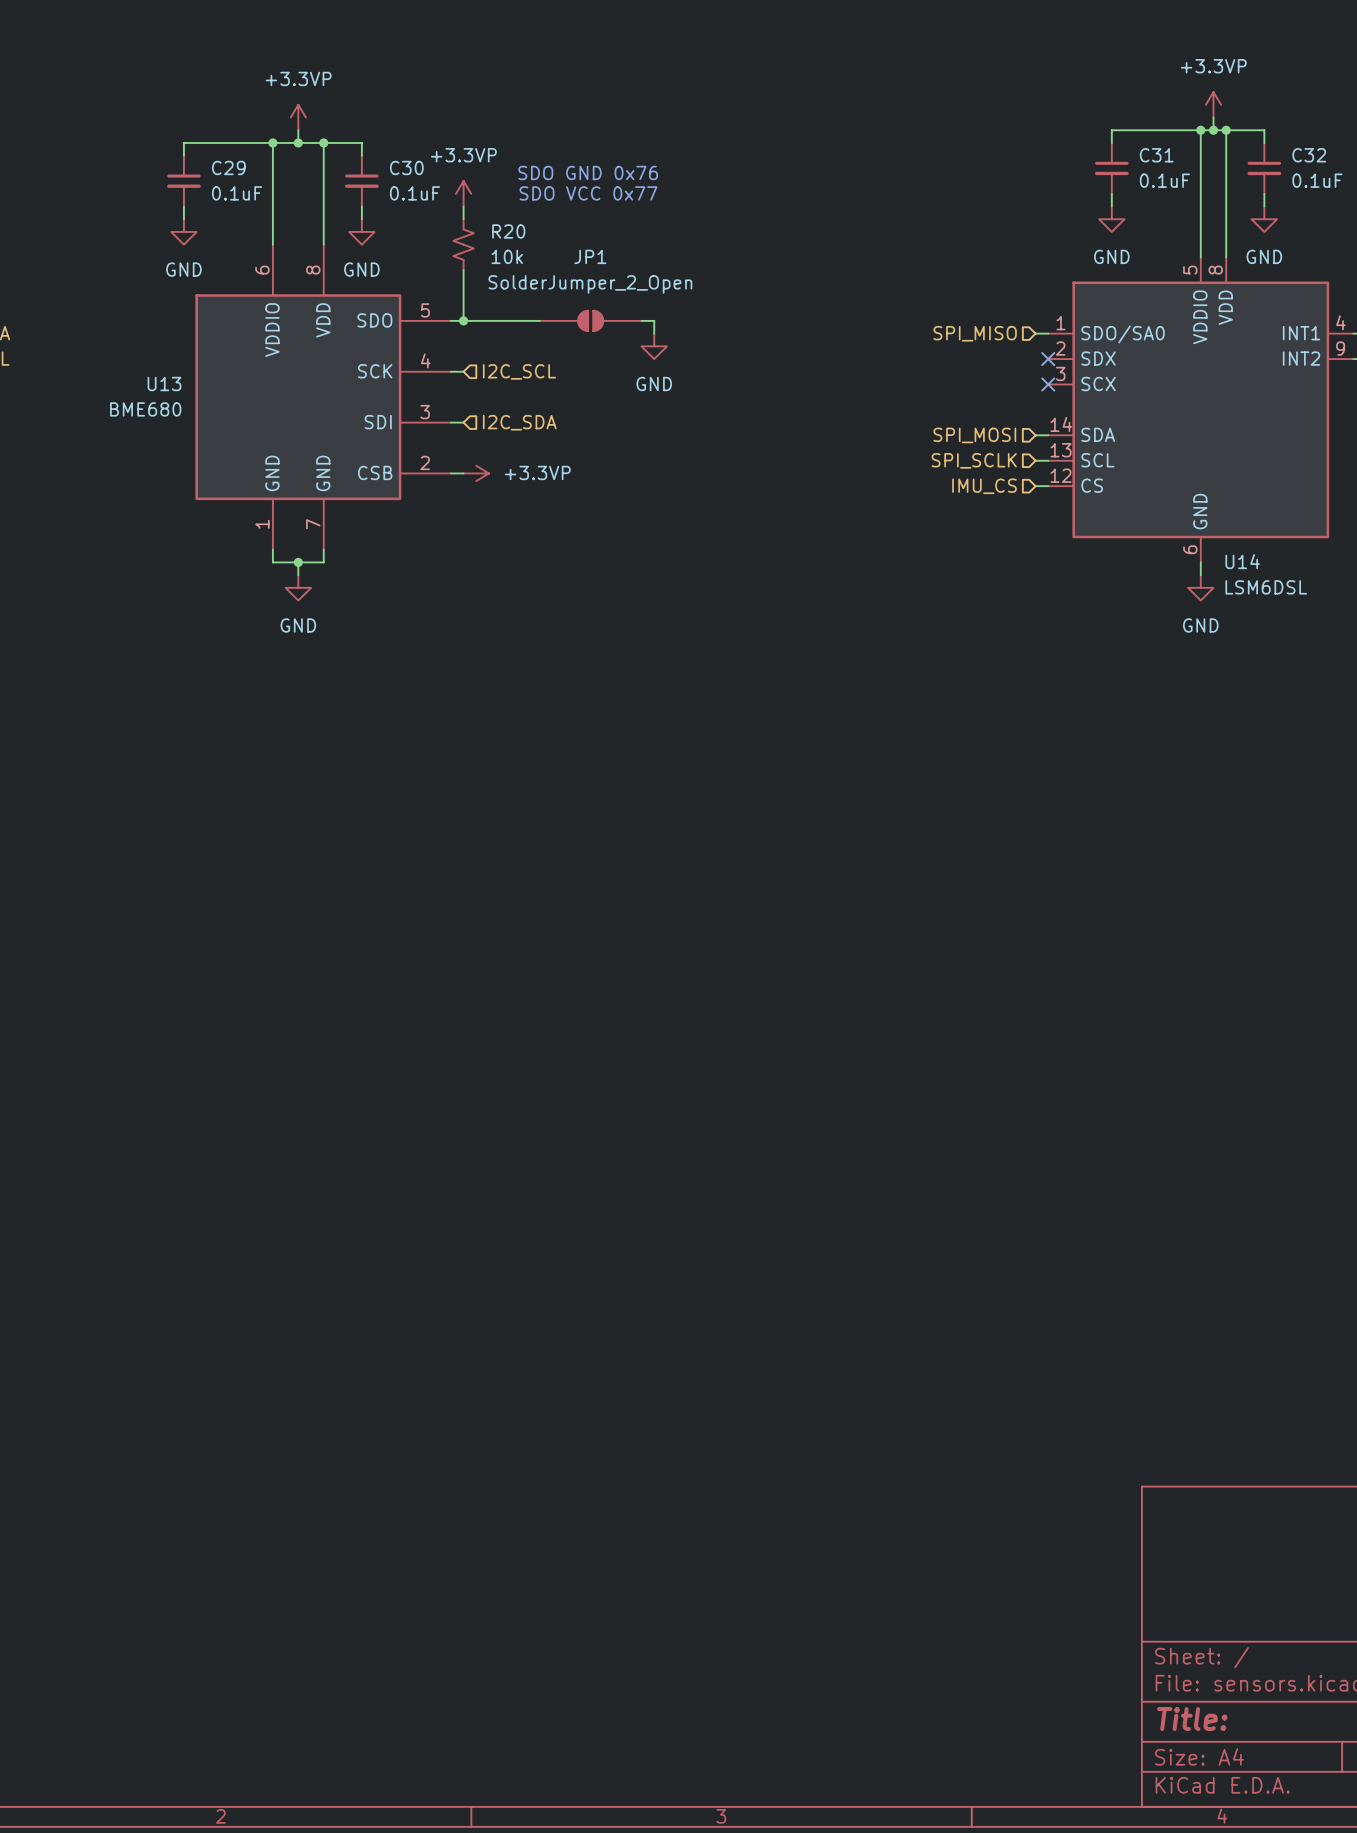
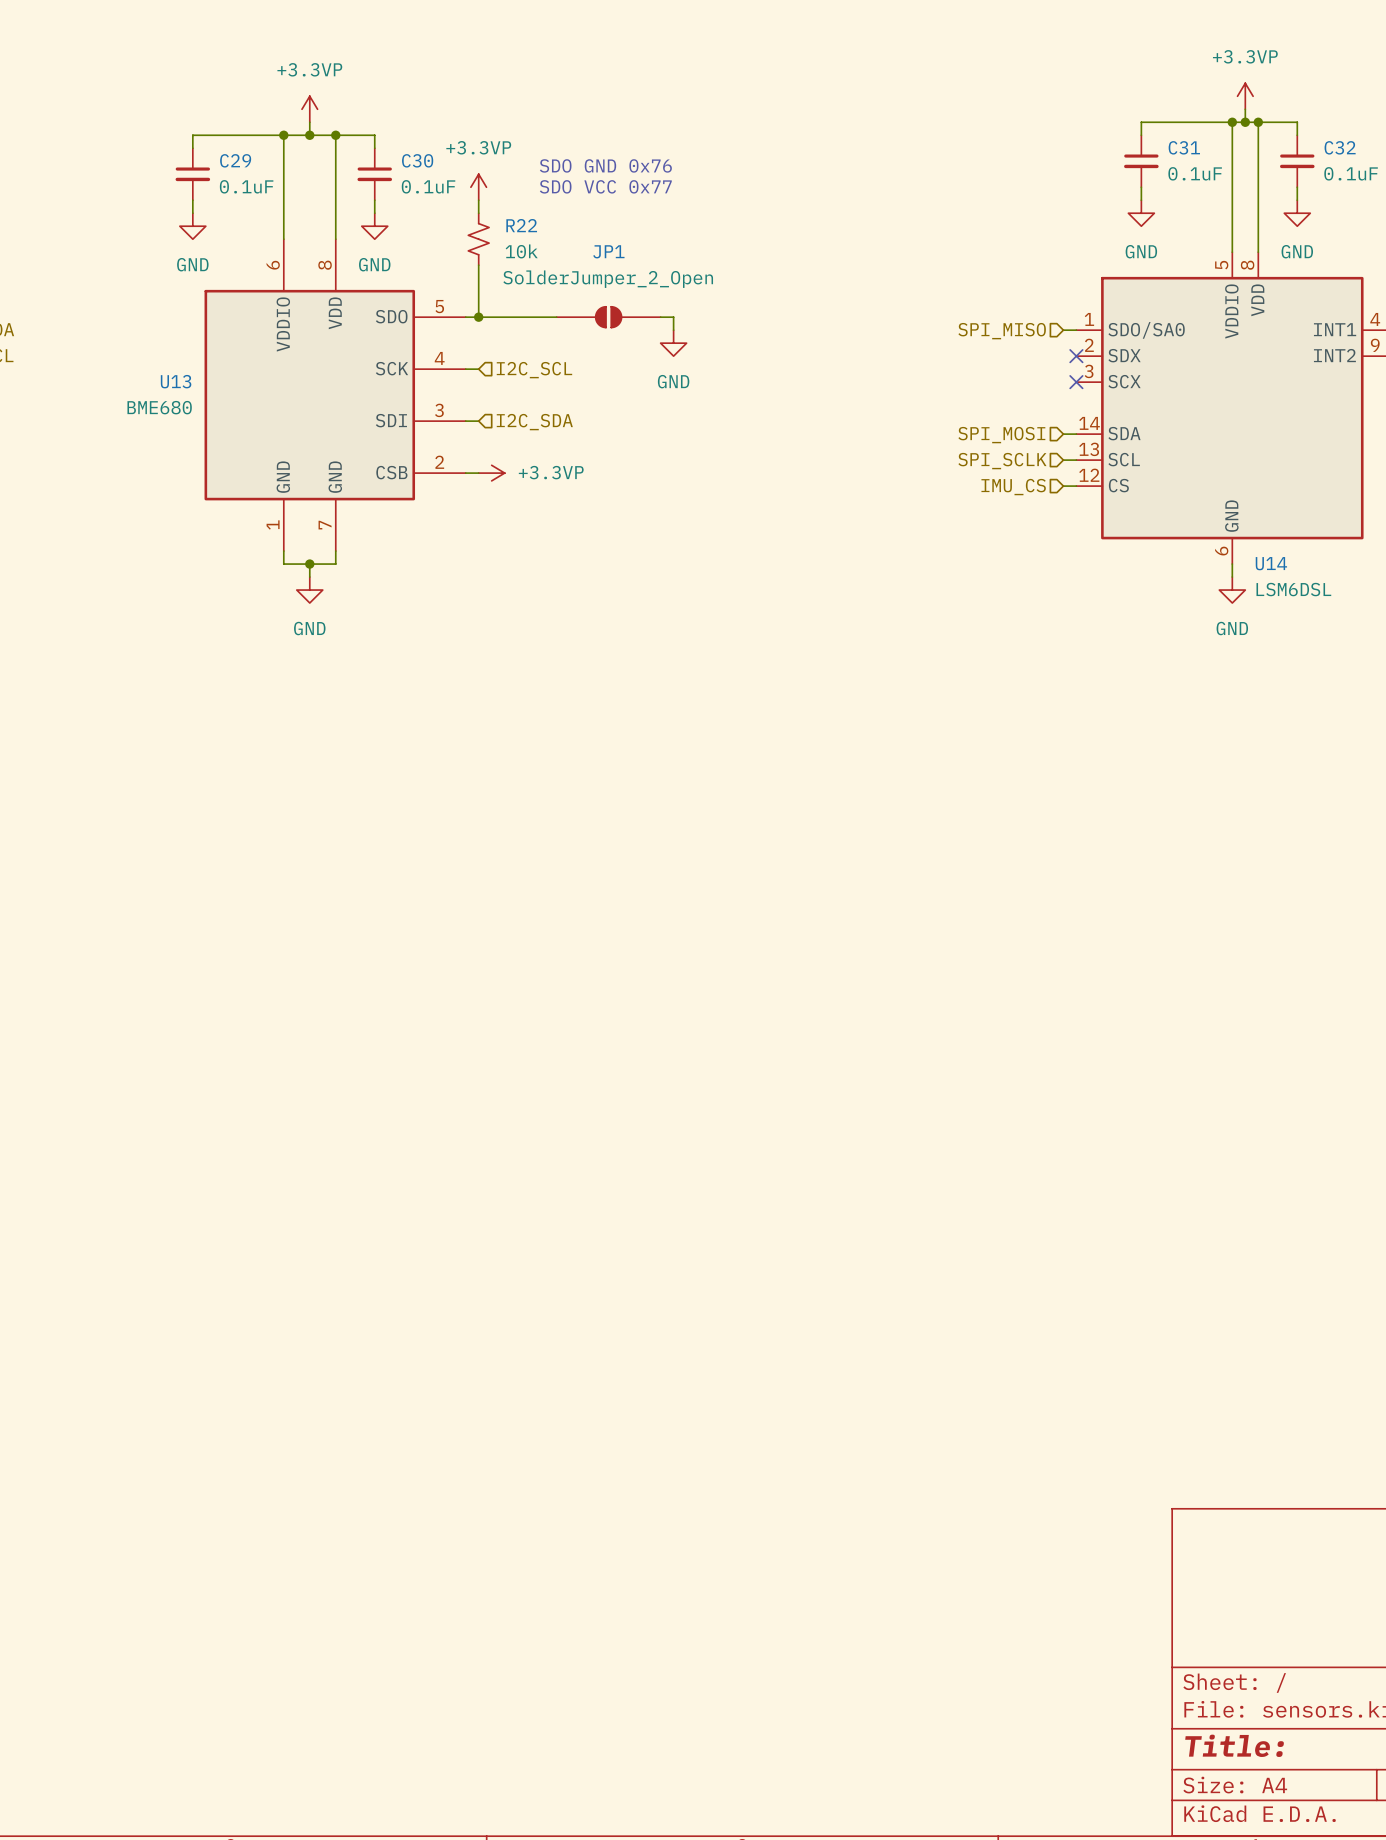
R20 name: R20 (508, 231) -> R22 (521, 225)

